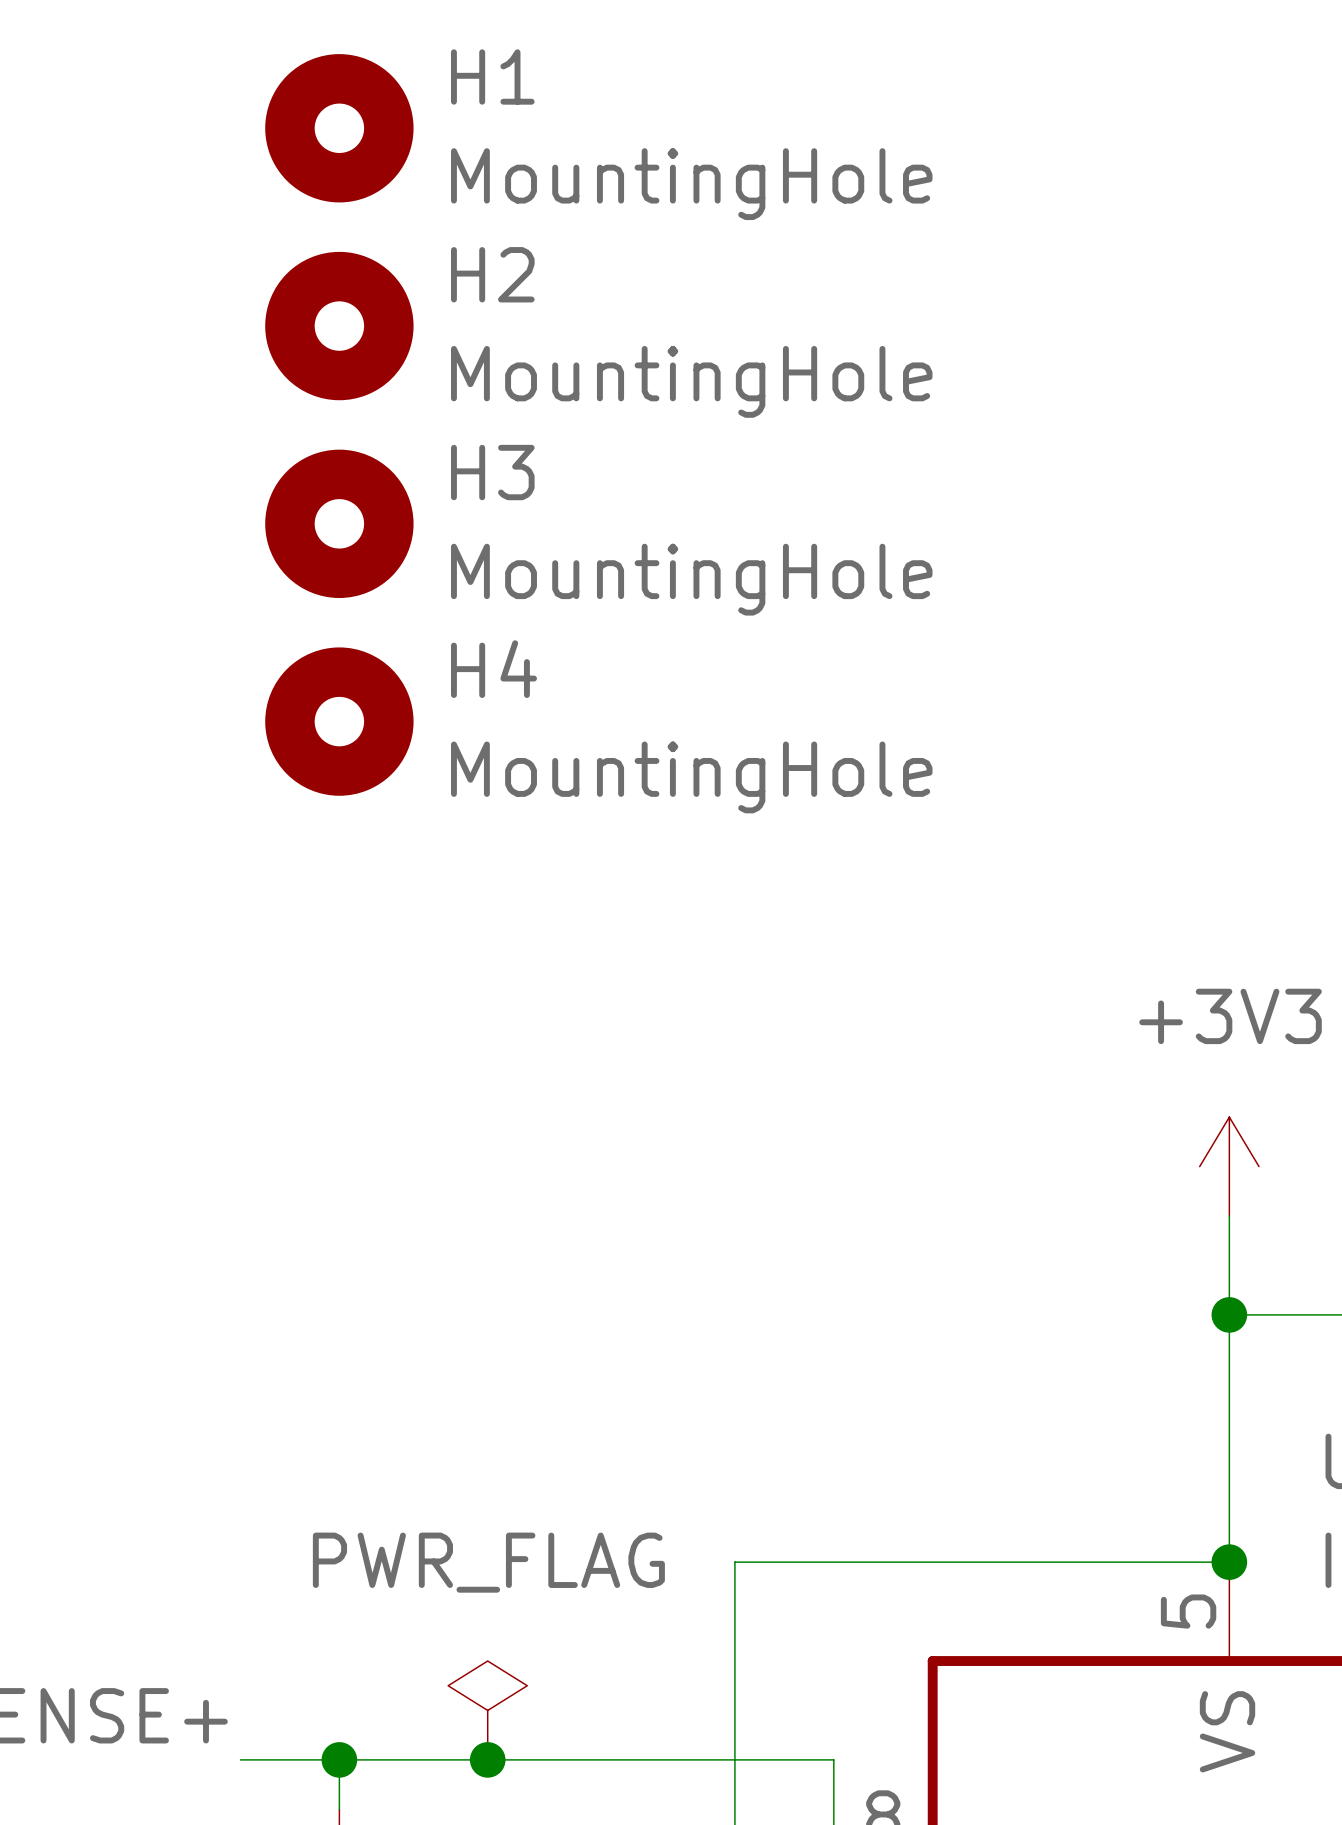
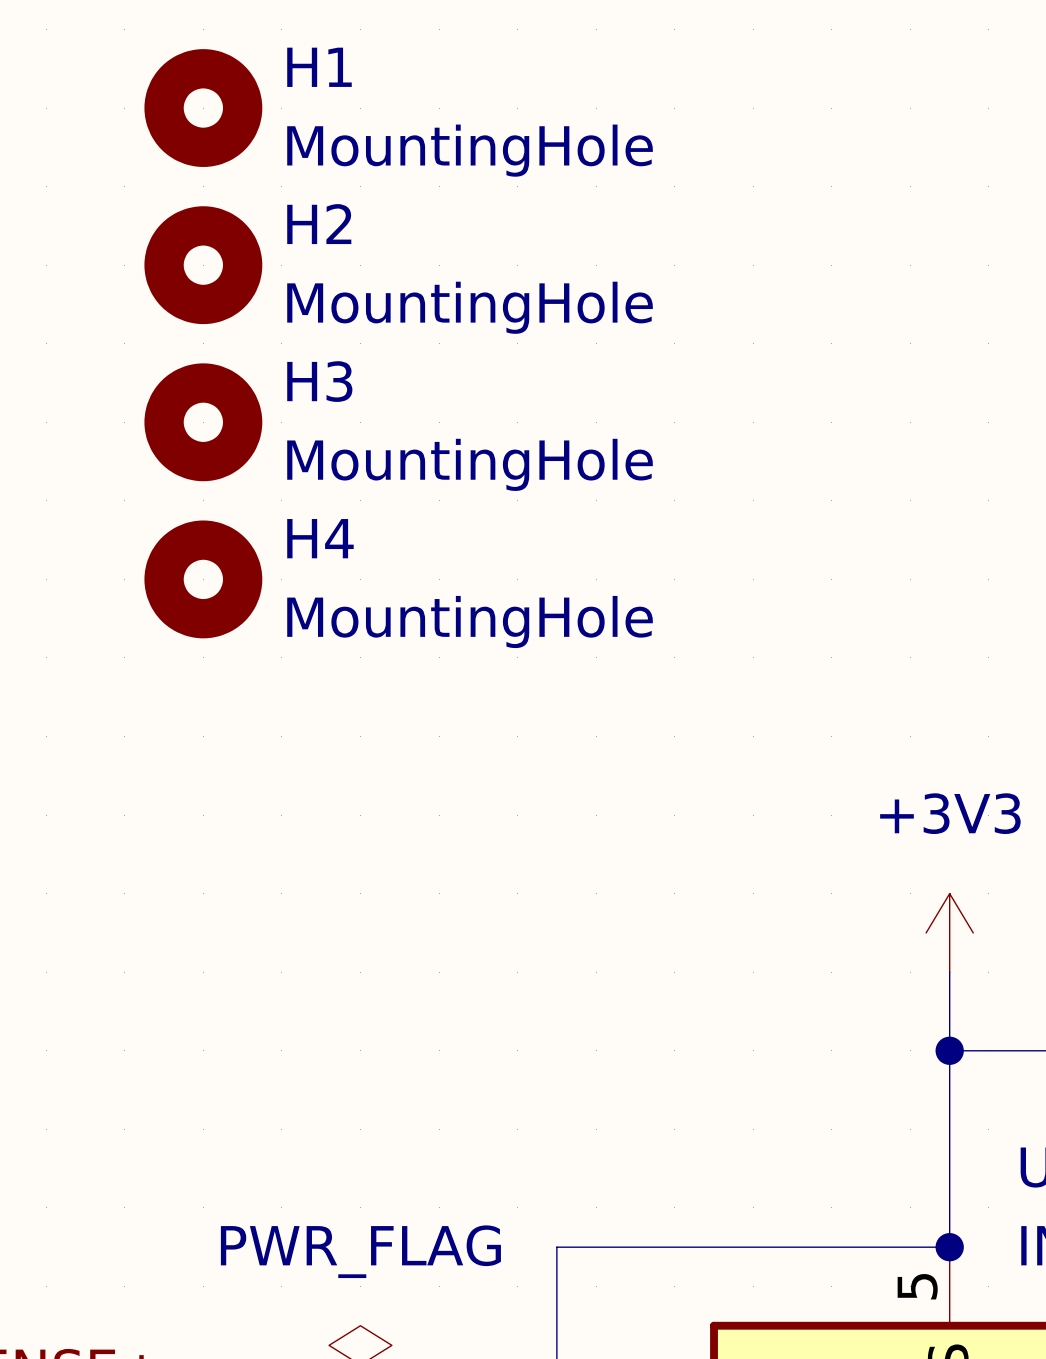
H1 position: (339, 128) -> (203, 108)
H2 position: (339, 326) -> (203, 265)
H3 position: (339, 523) -> (203, 422)
H4 position: (339, 721) -> (203, 579)

